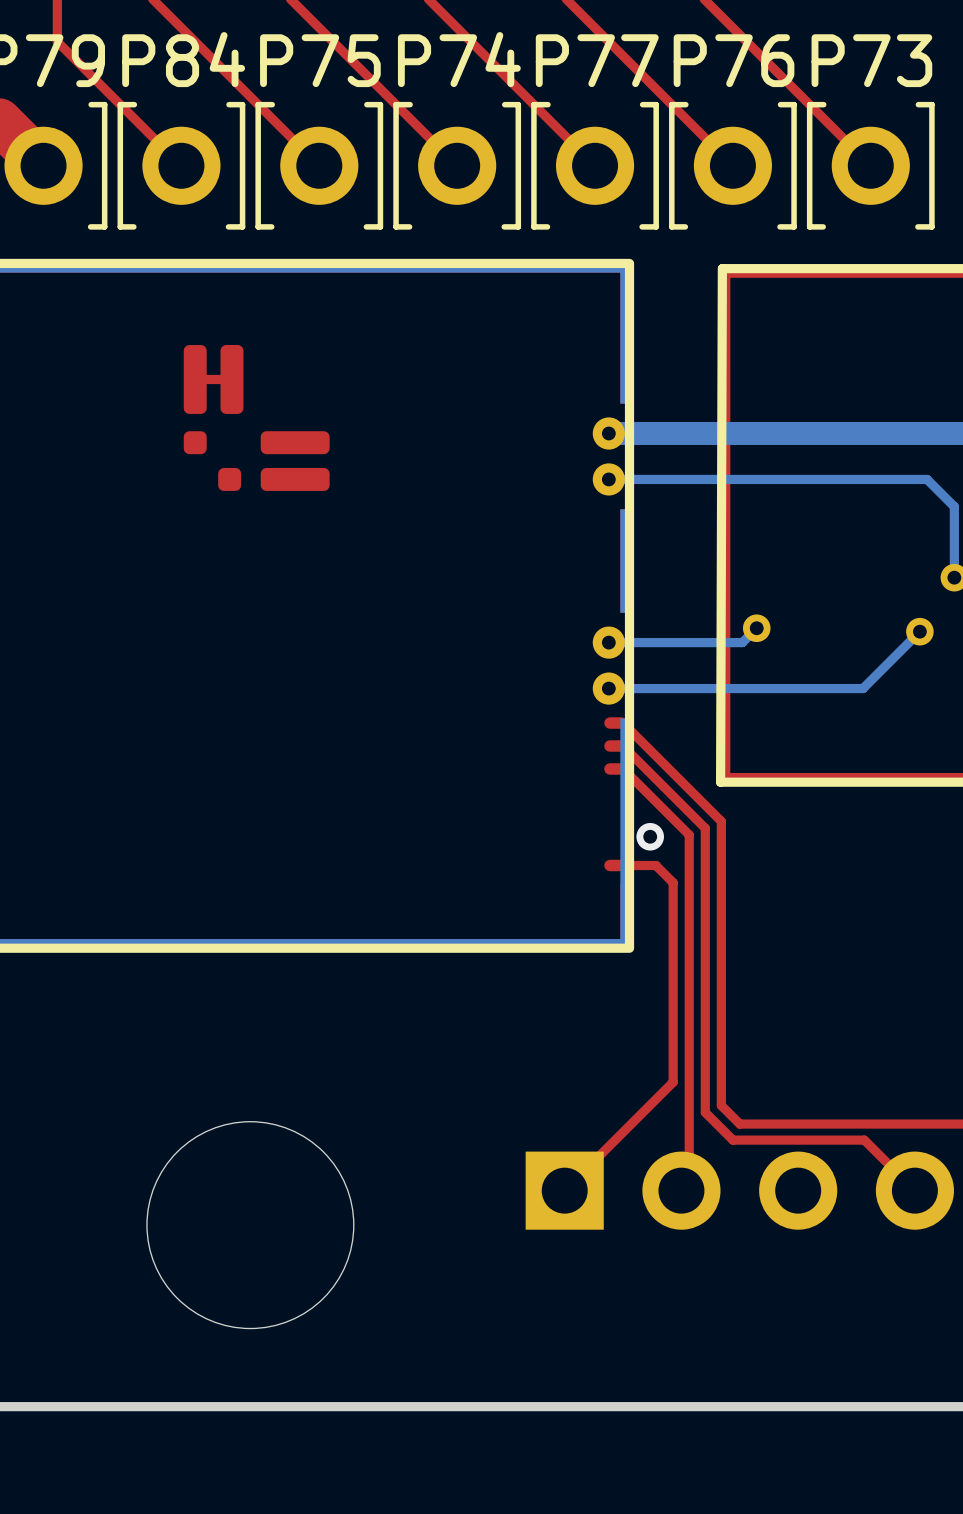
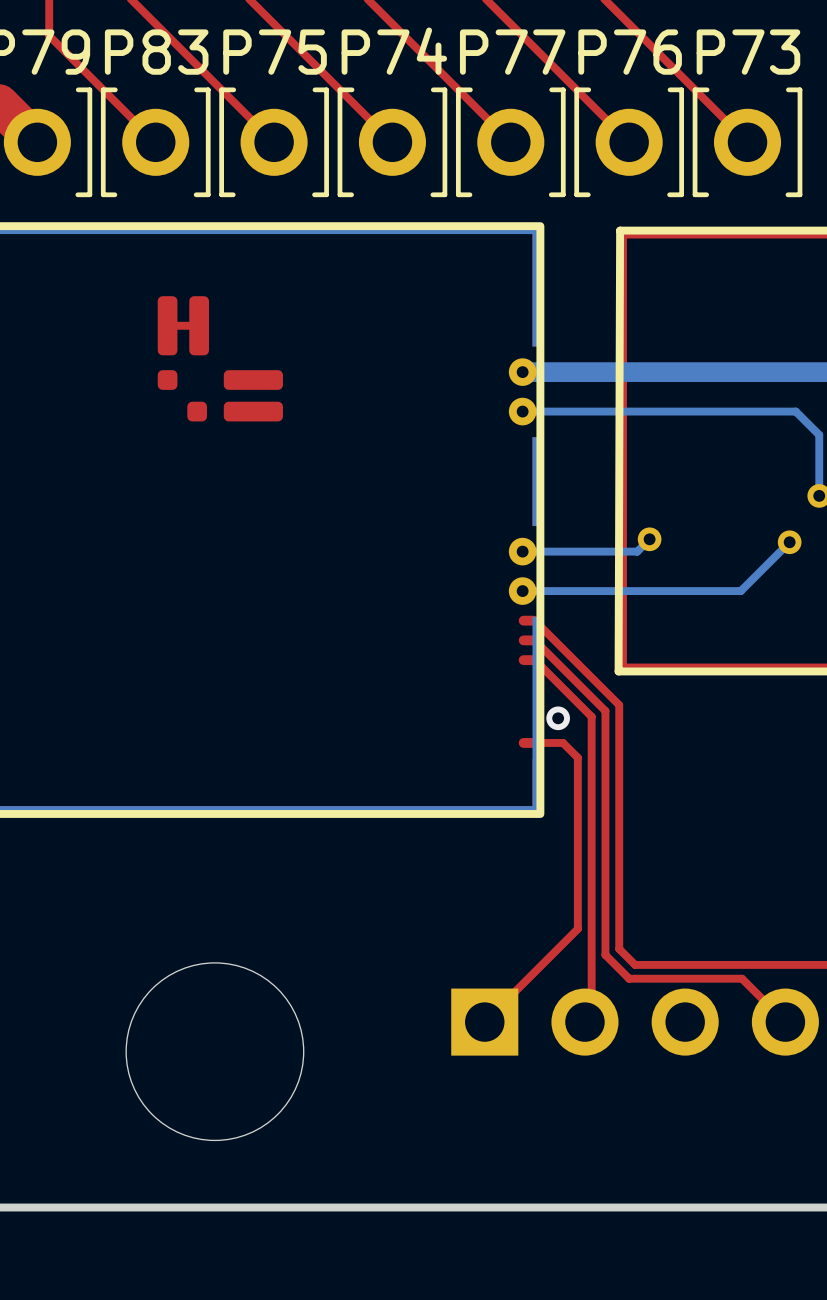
P84 name: P84 (183, 59) -> P83 (156, 52)

